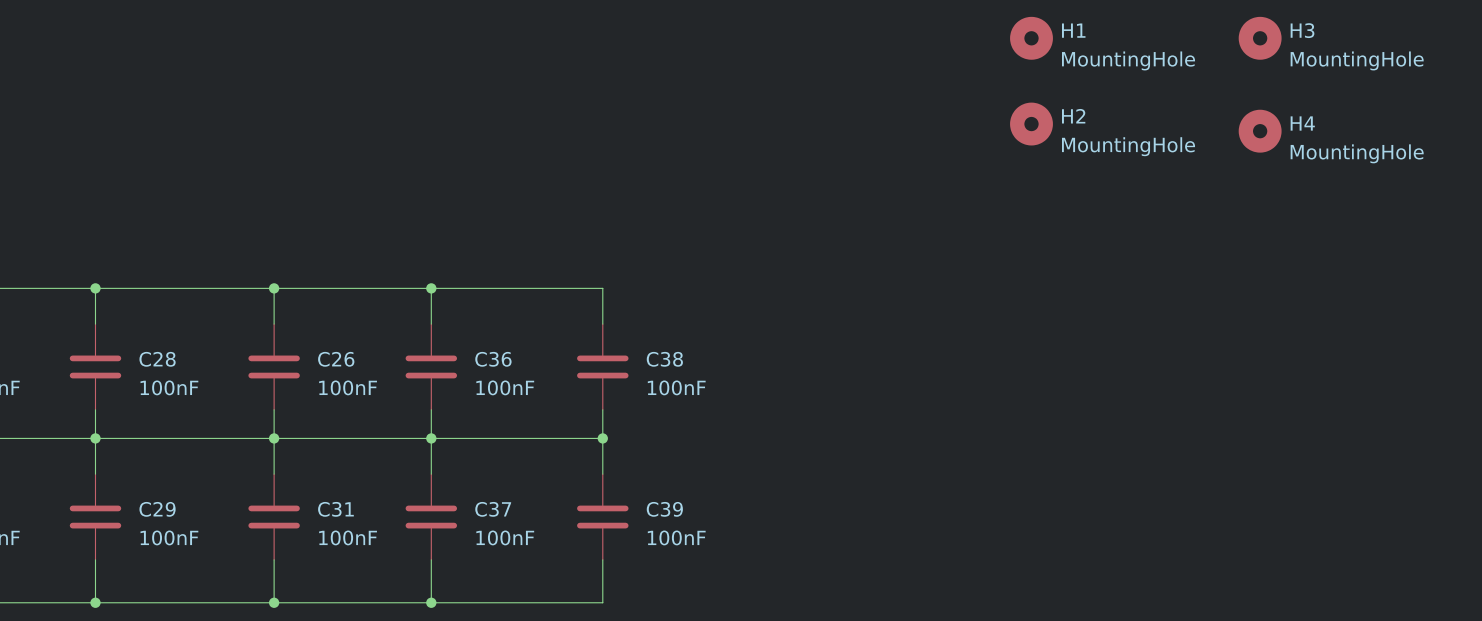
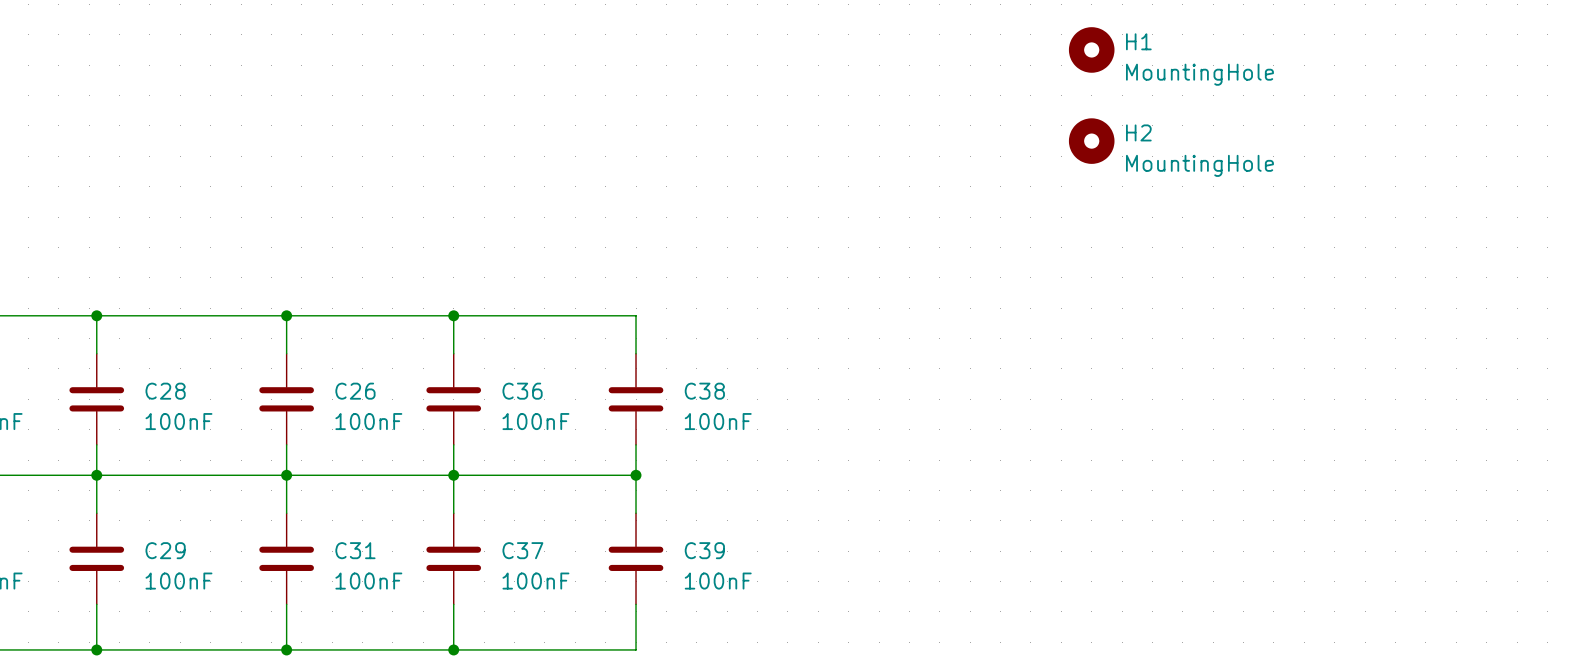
H3: MountingHole (1260, 38) -> none
H4: MountingHole (1260, 131) -> none

